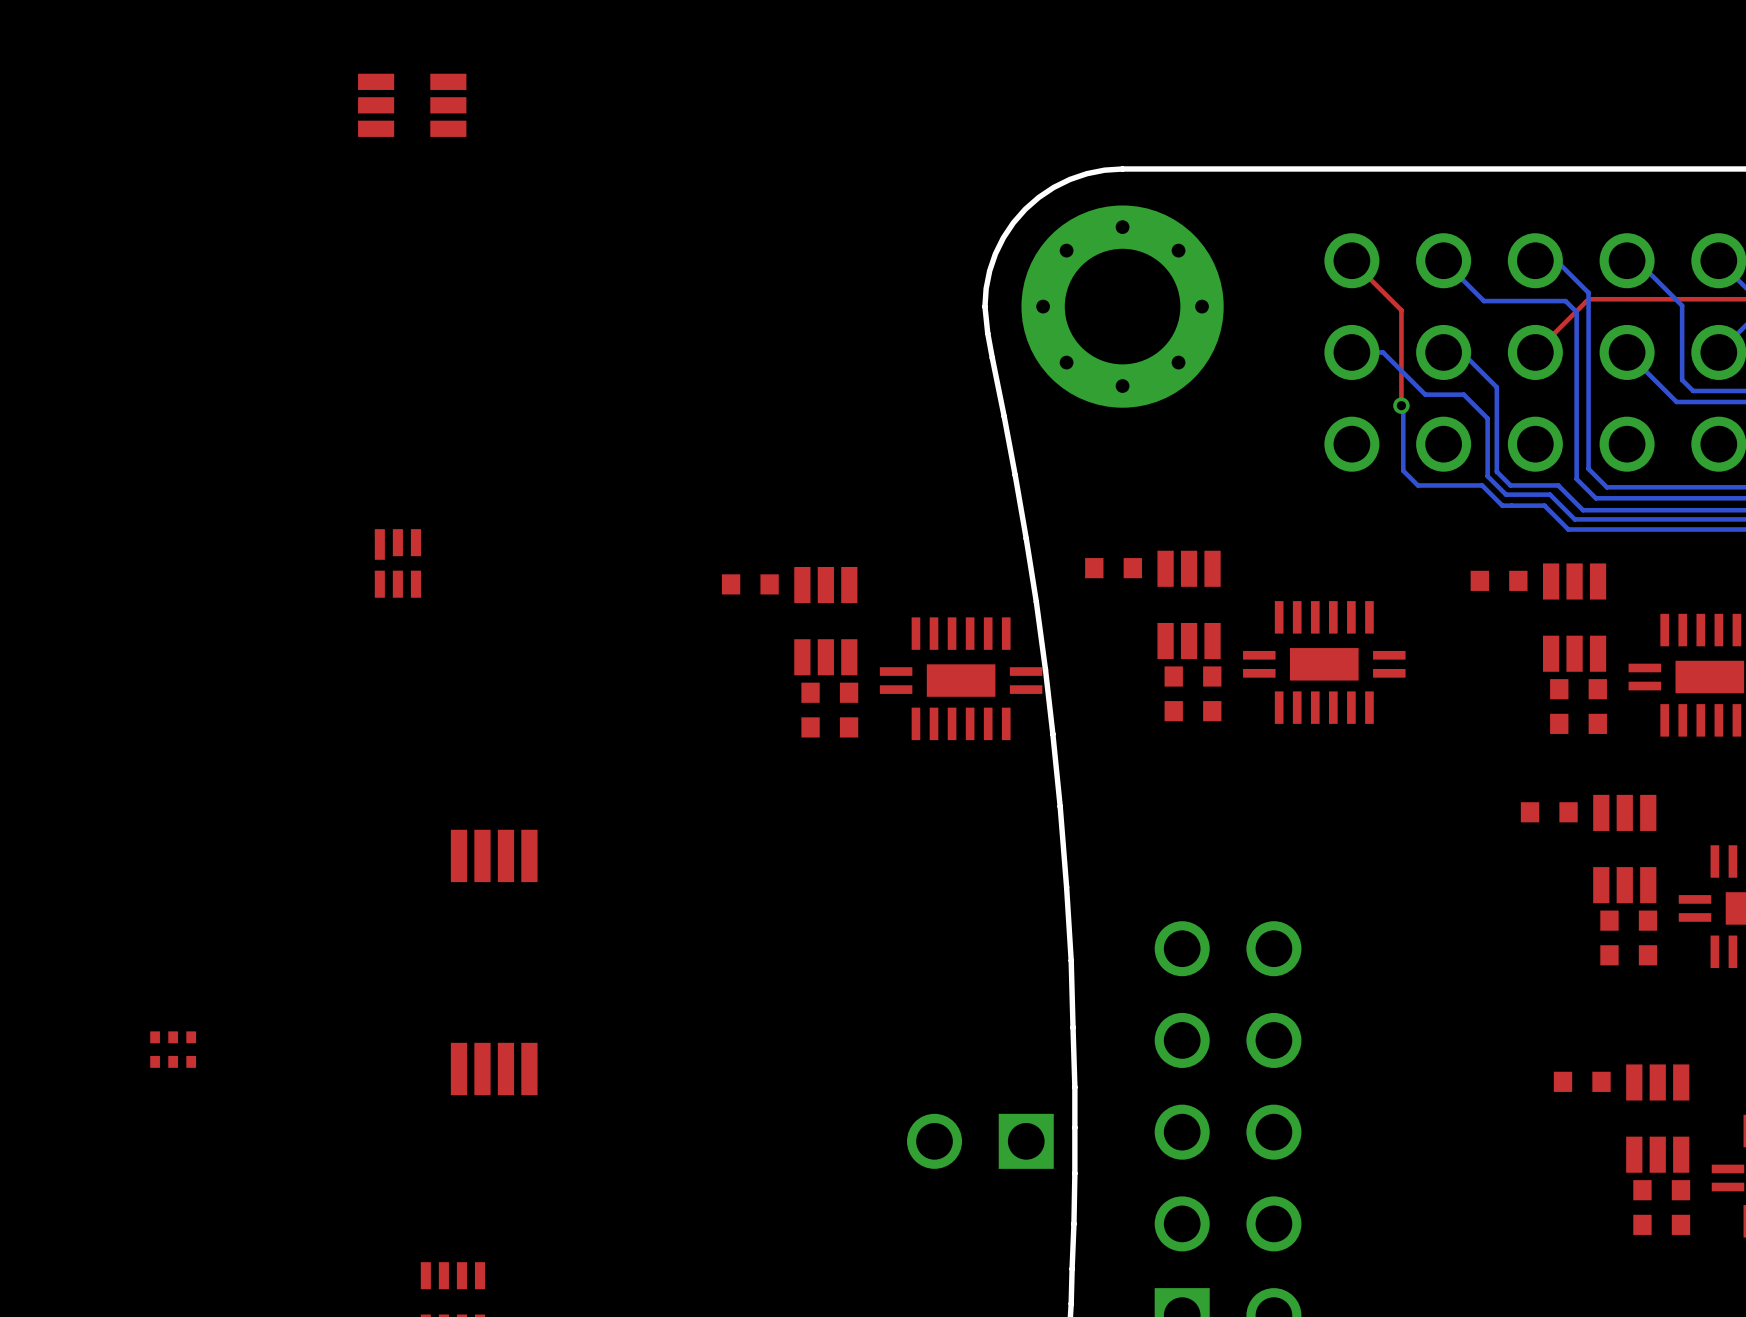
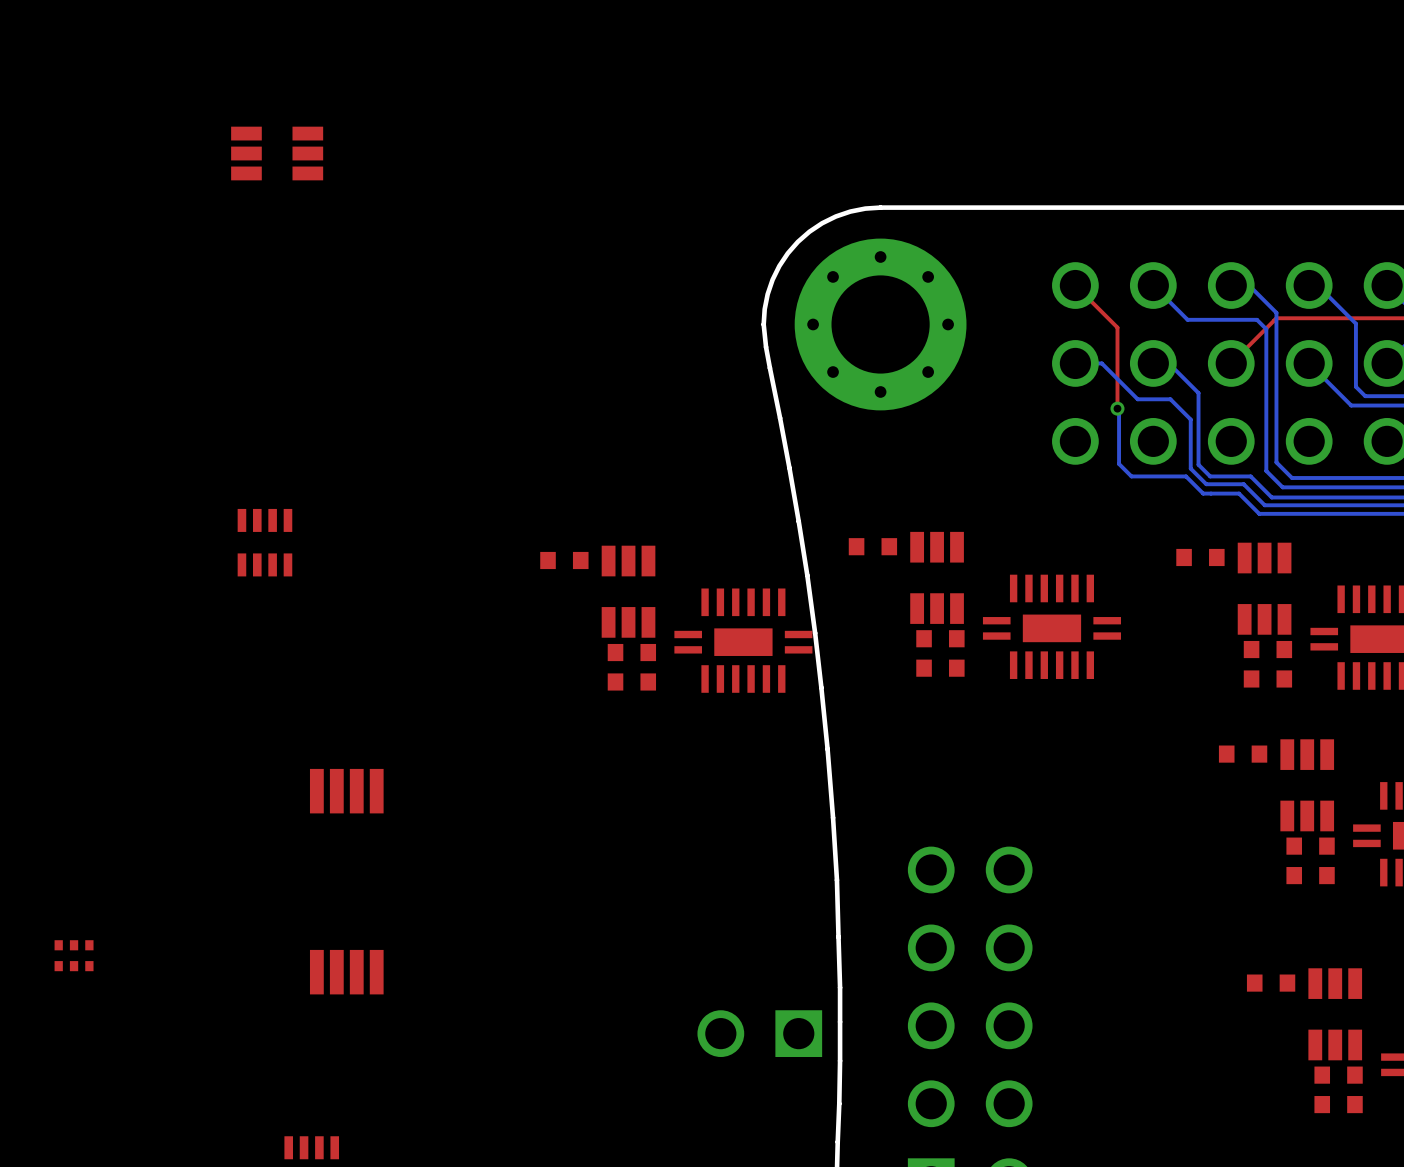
part footprint: [374, 529, 422, 598] -> [237, 508, 293, 577]

